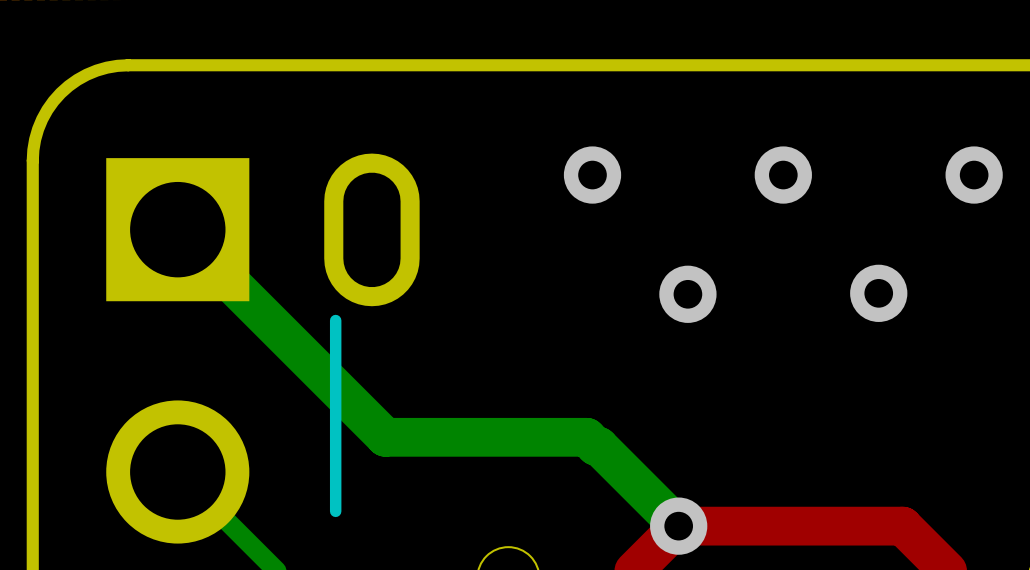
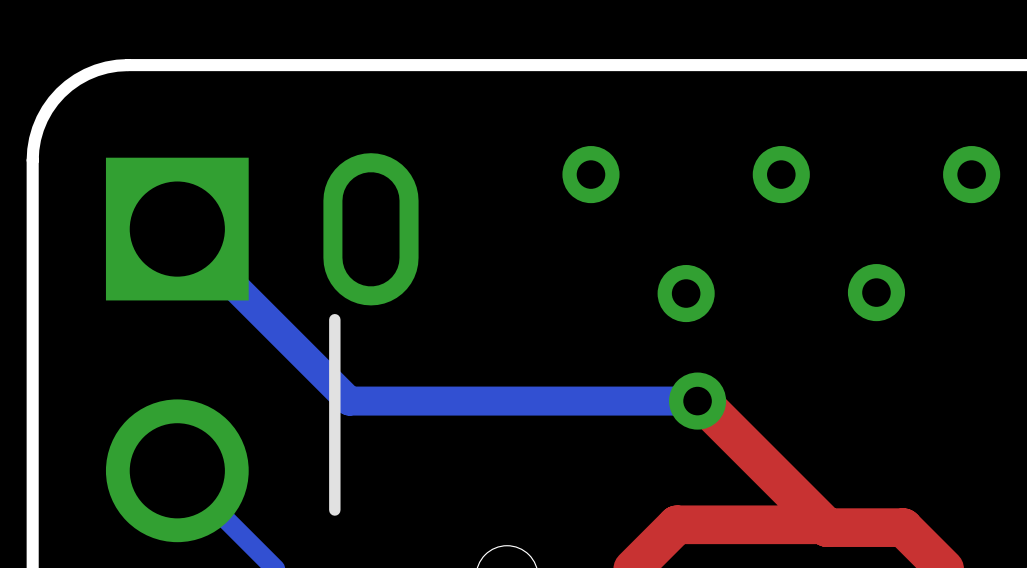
bottom track width: thick (177, 229) (350, 402) -> thin (177, 229) (349, 401)
bottom track: (350, 402) (385, 437) (586, 437) (595, 446) (598, 446) (678, 526) -> (349, 401) (697, 401)
via position: (678, 526) -> (697, 401)
top track: (826, 526) (902, 526) (905, 529) -> (695, 396) (827, 527) (903, 527)

